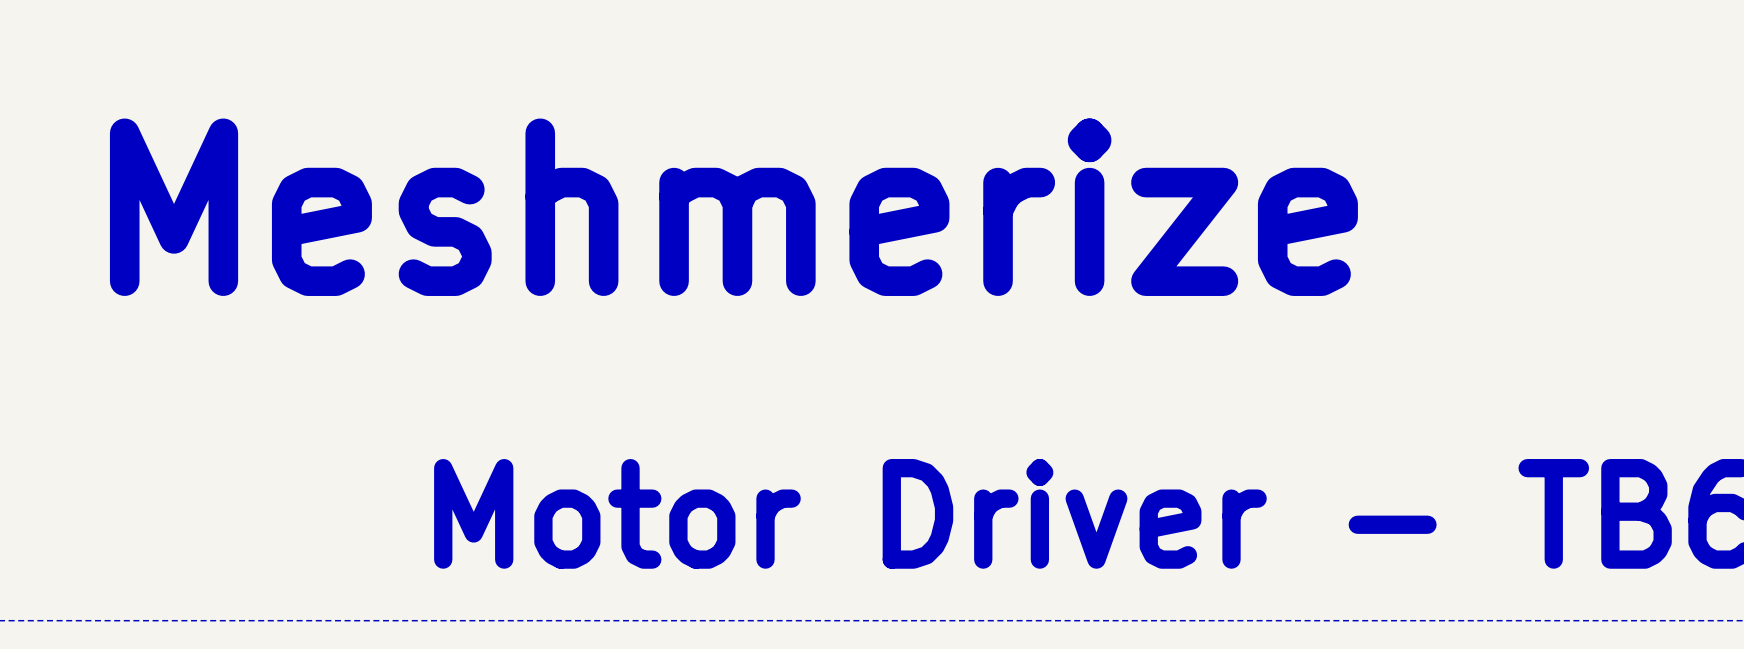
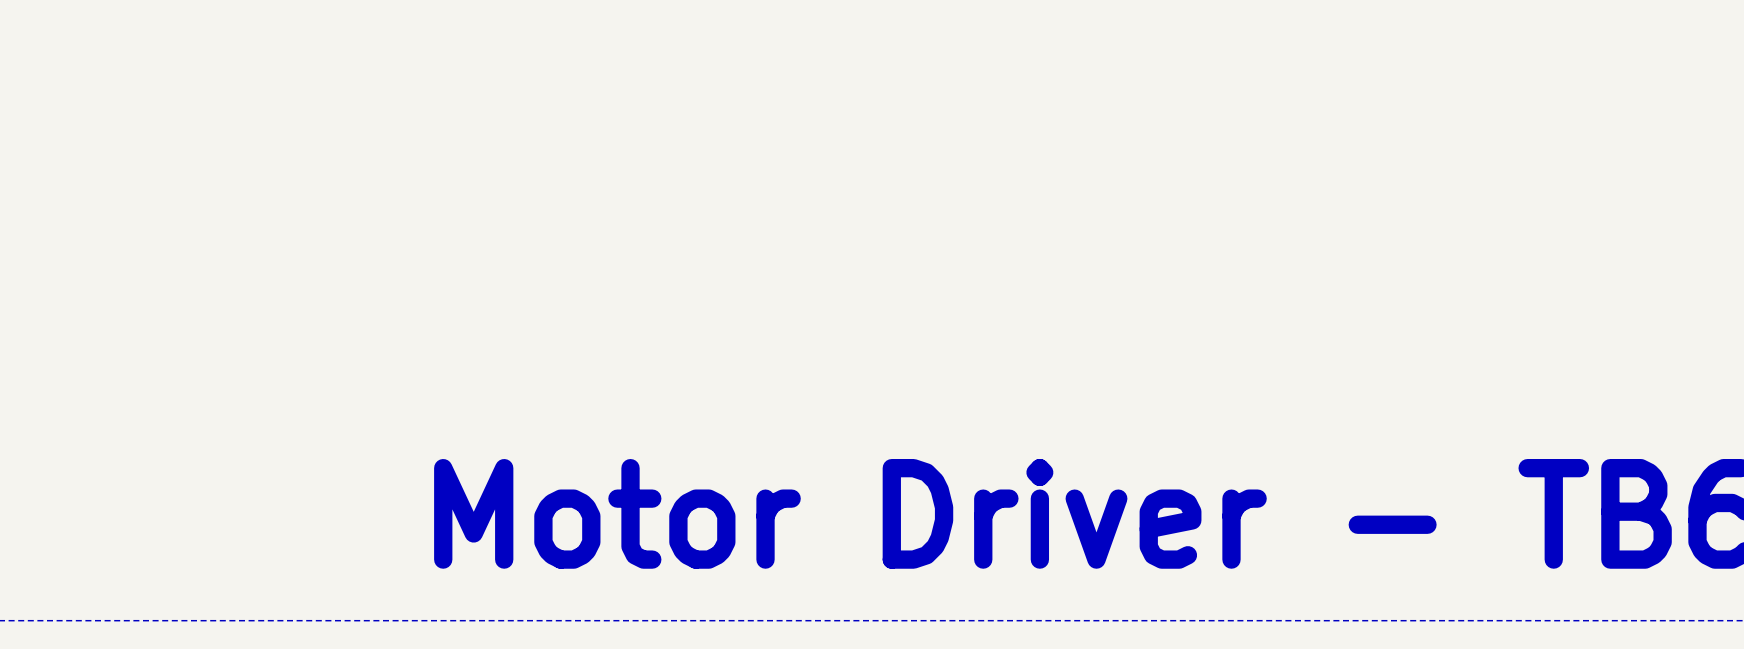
text: Meshmerize (733, 207) -> none

